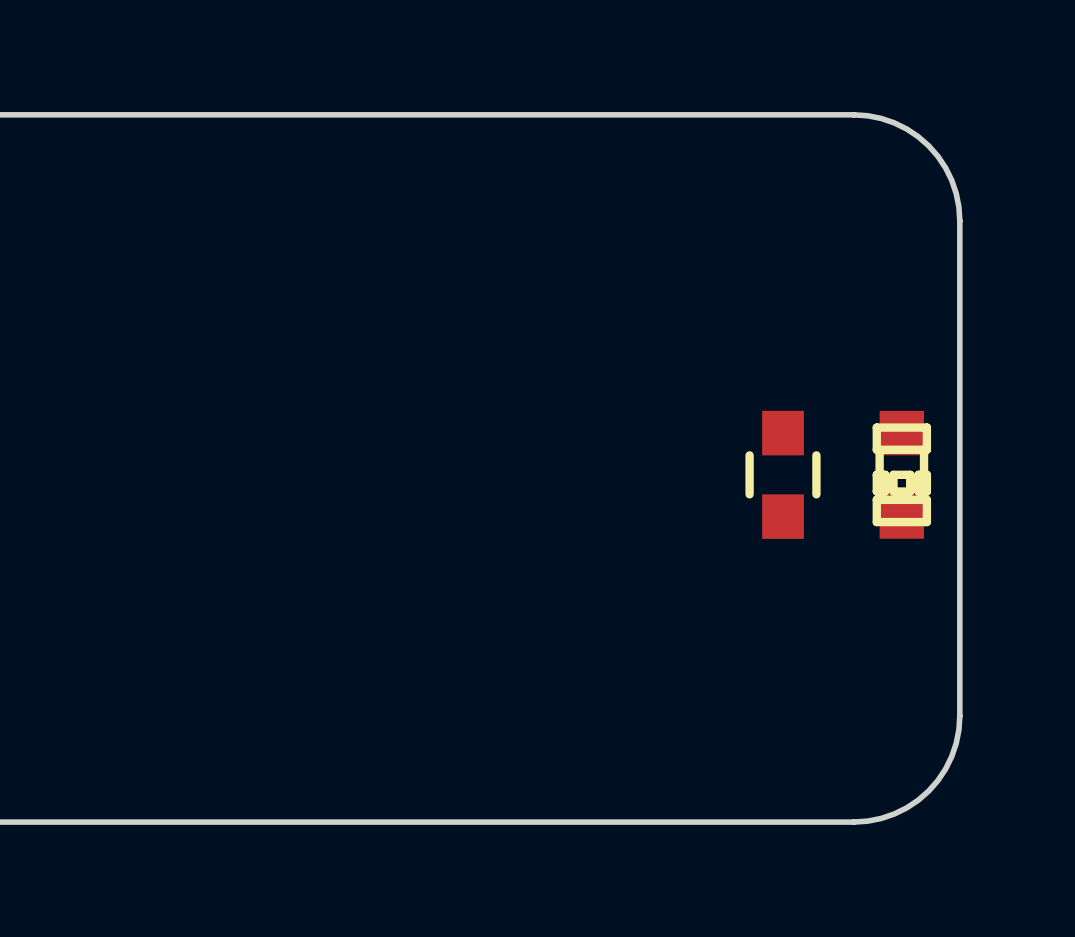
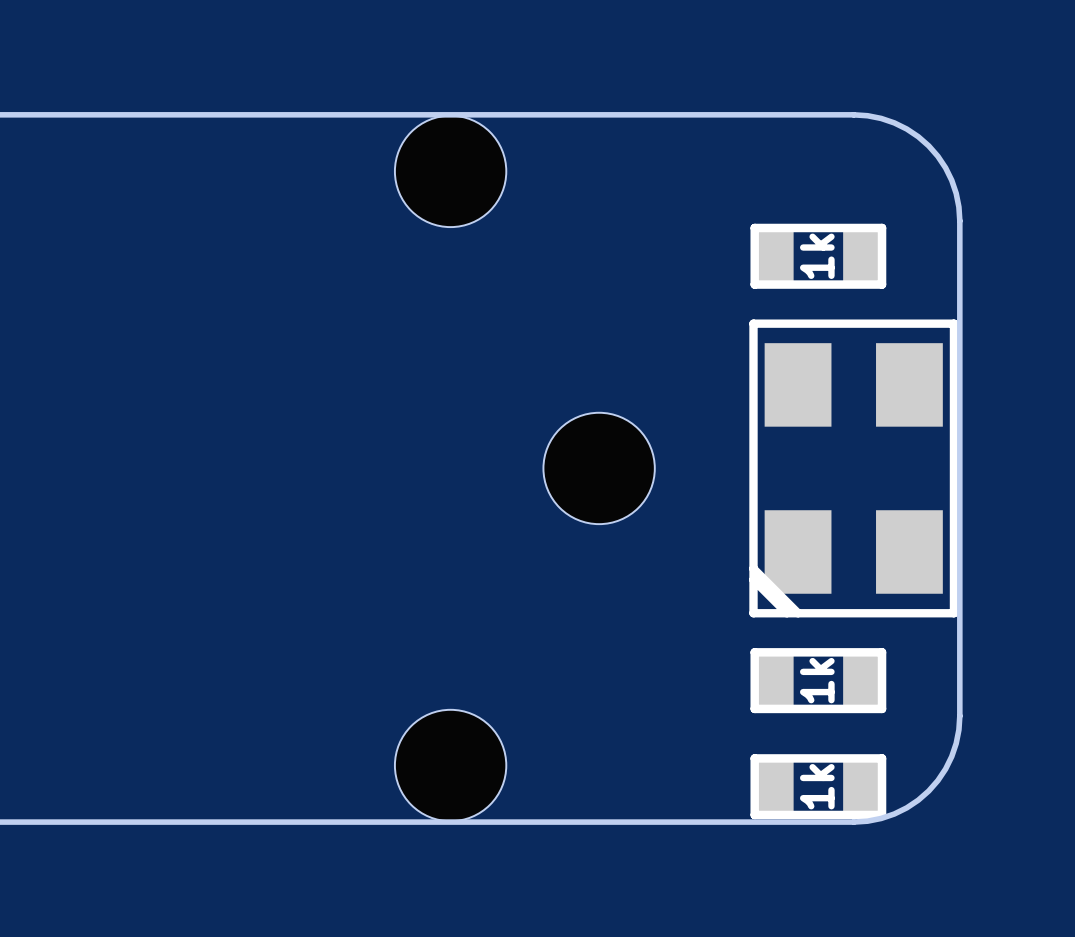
part: none -> (450, 171)
part: none -> 1k (818, 256)
part: none -> (599, 468)
part: none -> (853, 468)
part: (783, 474) -> none
part: (901, 474) -> none
part: none -> 1k (818, 680)
part: none -> (450, 765)
part: none -> 1k (818, 786)

